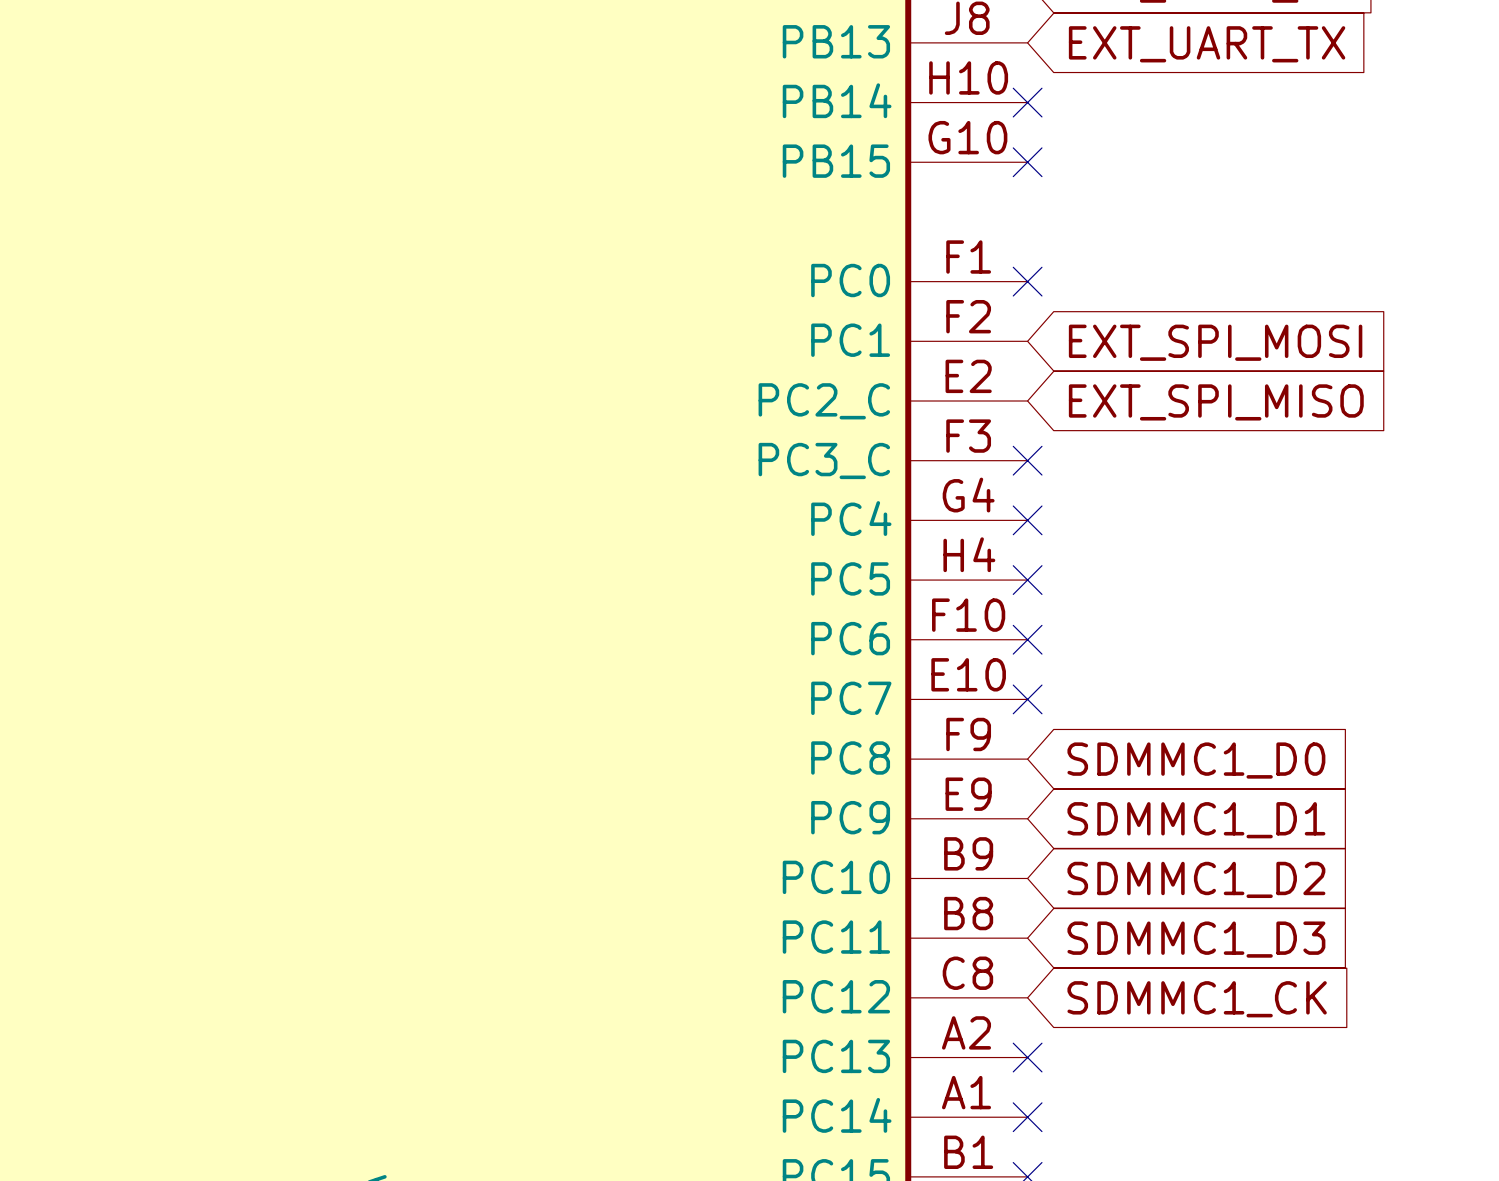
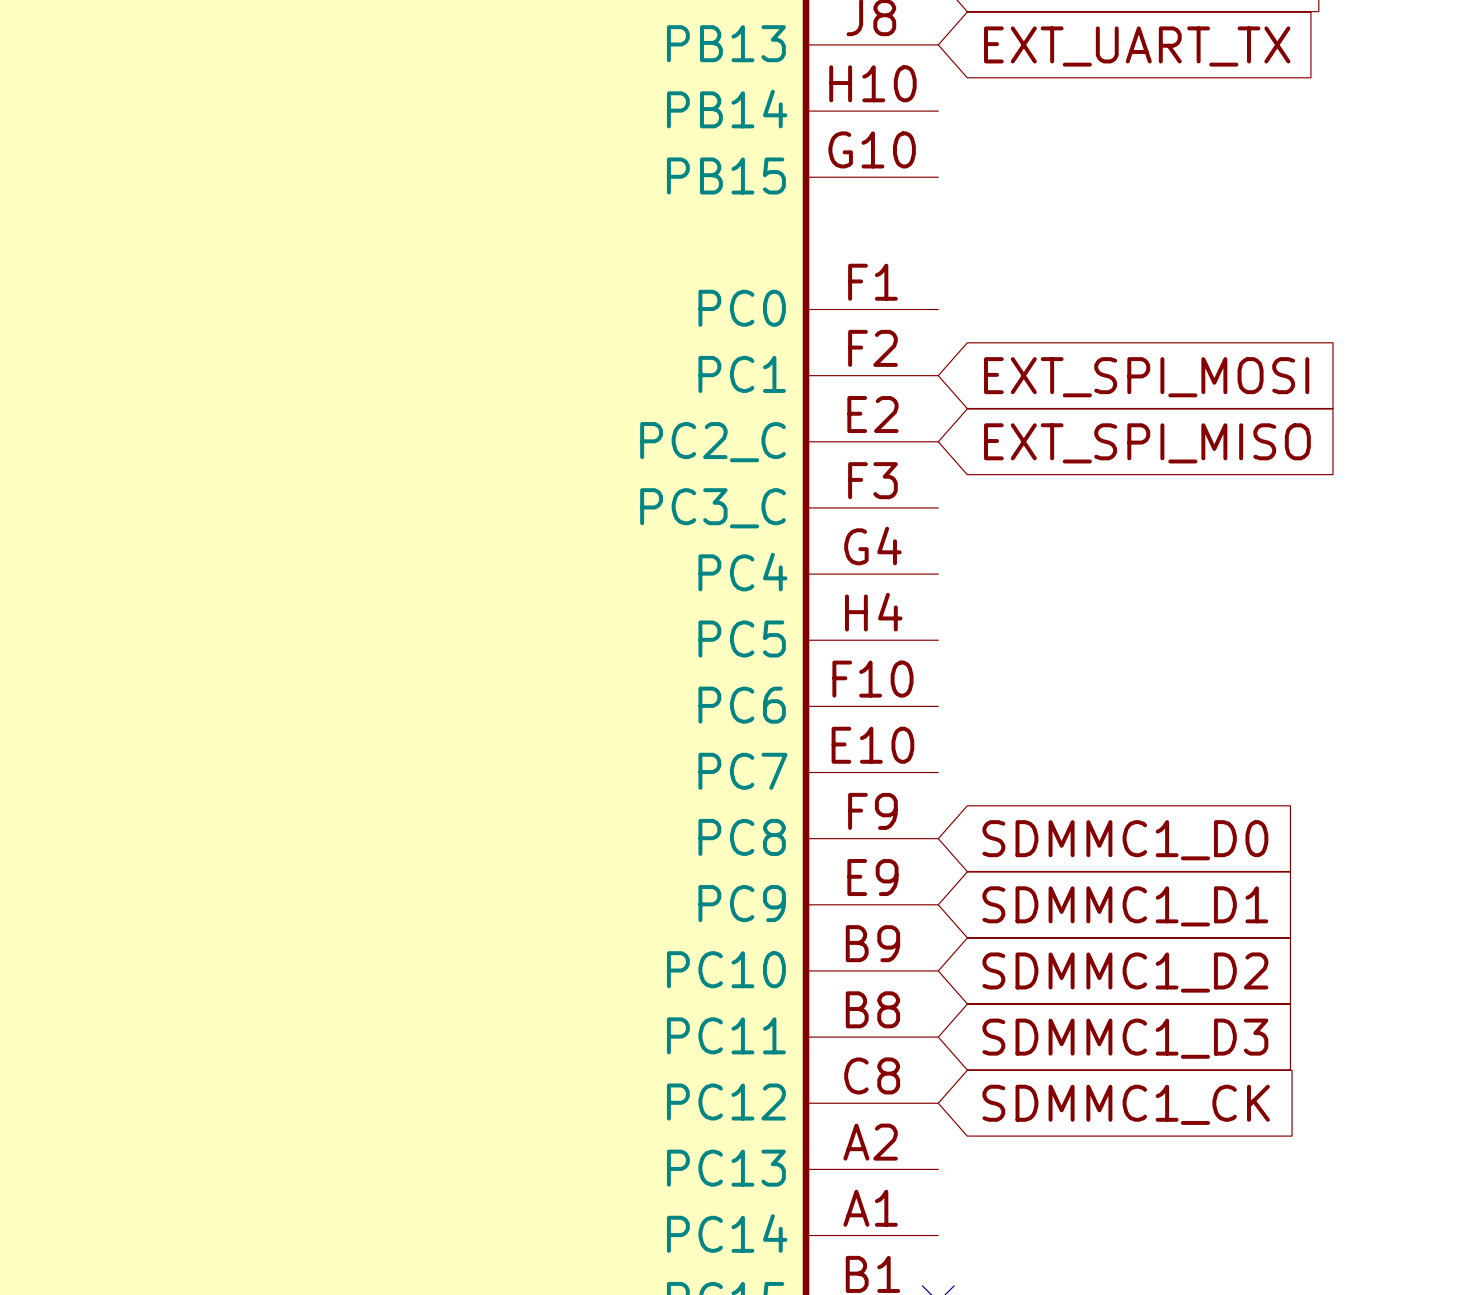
no-connect mark: (1027, 102) -> none
no-connect mark: (1027, 162) -> none
no-connect mark: (1027, 281) -> none
no-connect mark: (1027, 460) -> none
no-connect mark: (1027, 520) -> none
no-connect mark: (1027, 580) -> none
no-connect mark: (1027, 639) -> none
no-connect mark: (1027, 699) -> none
no-connect mark: (1027, 1057) -> none
no-connect mark: (1027, 1117) -> none

